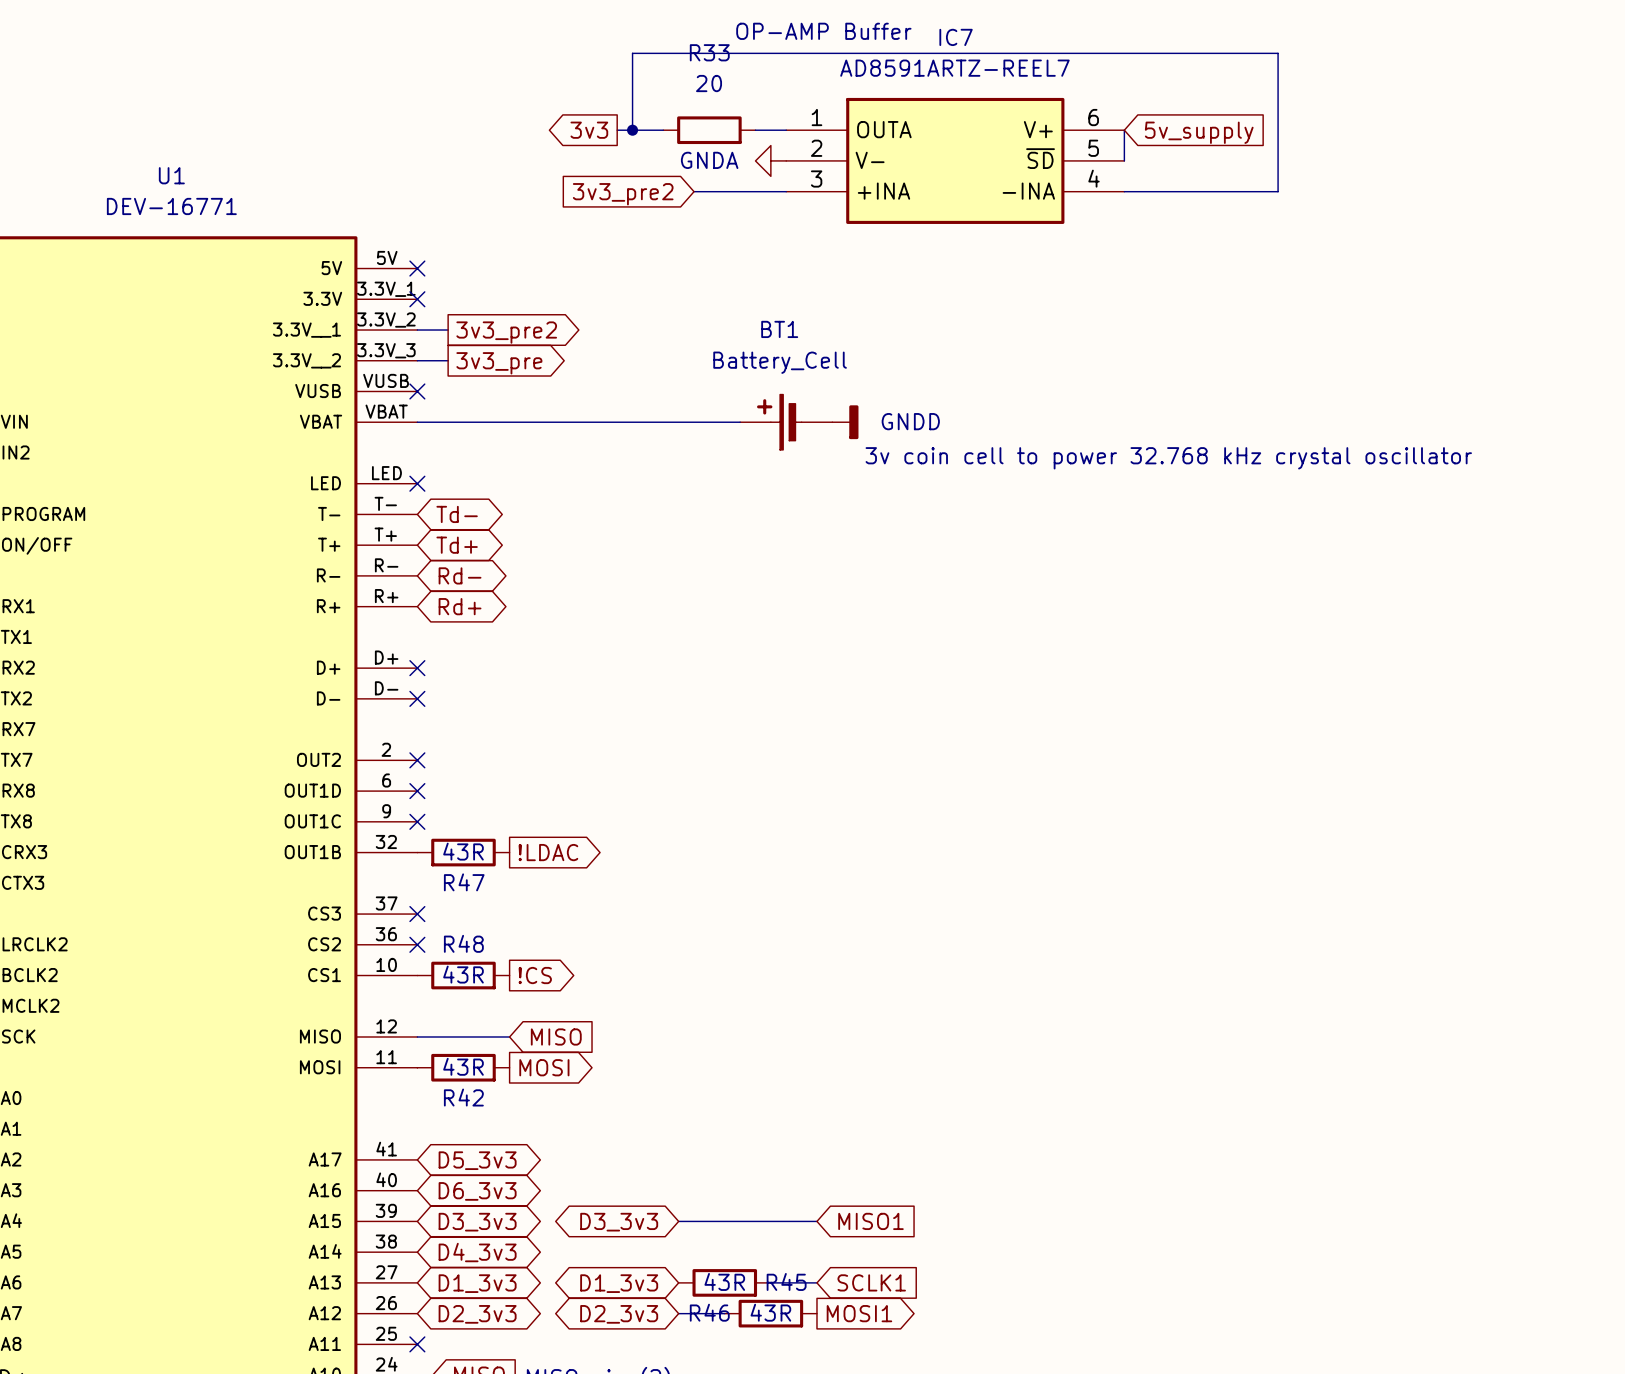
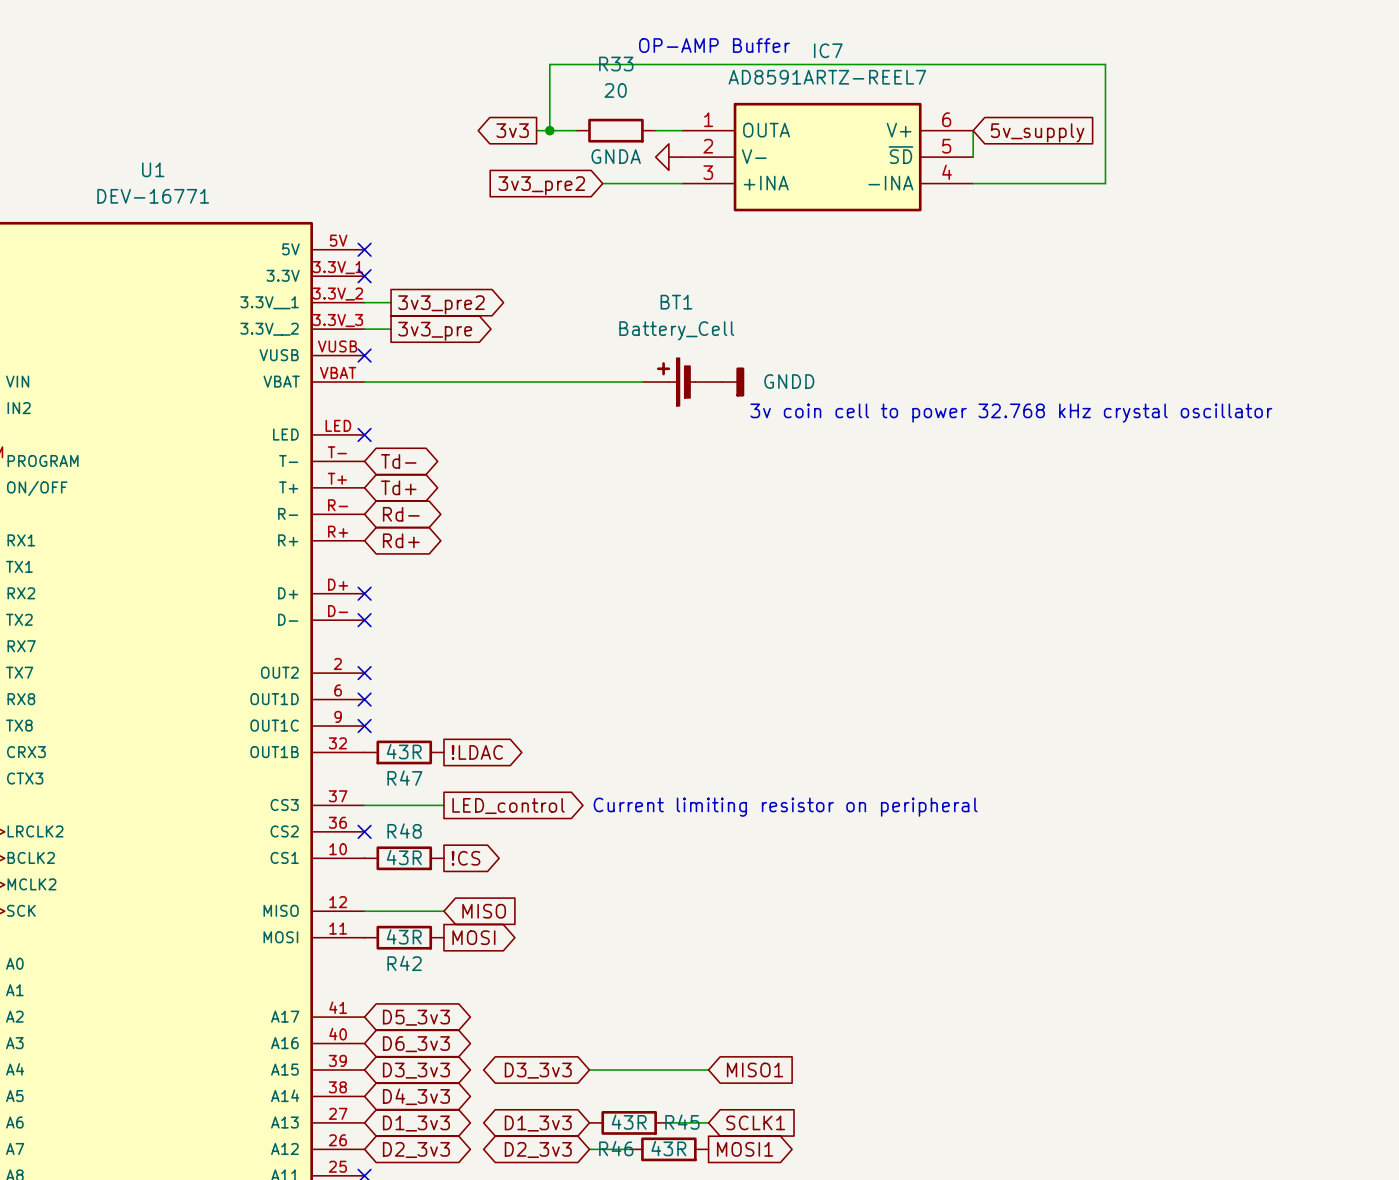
wire: none -> (364, 805) (443, 805)
no-connect mark: (417, 914) -> none
global label: none -> LED_control (508, 806)
text: none -> Current limiting resistor on peripheral (785, 807)

